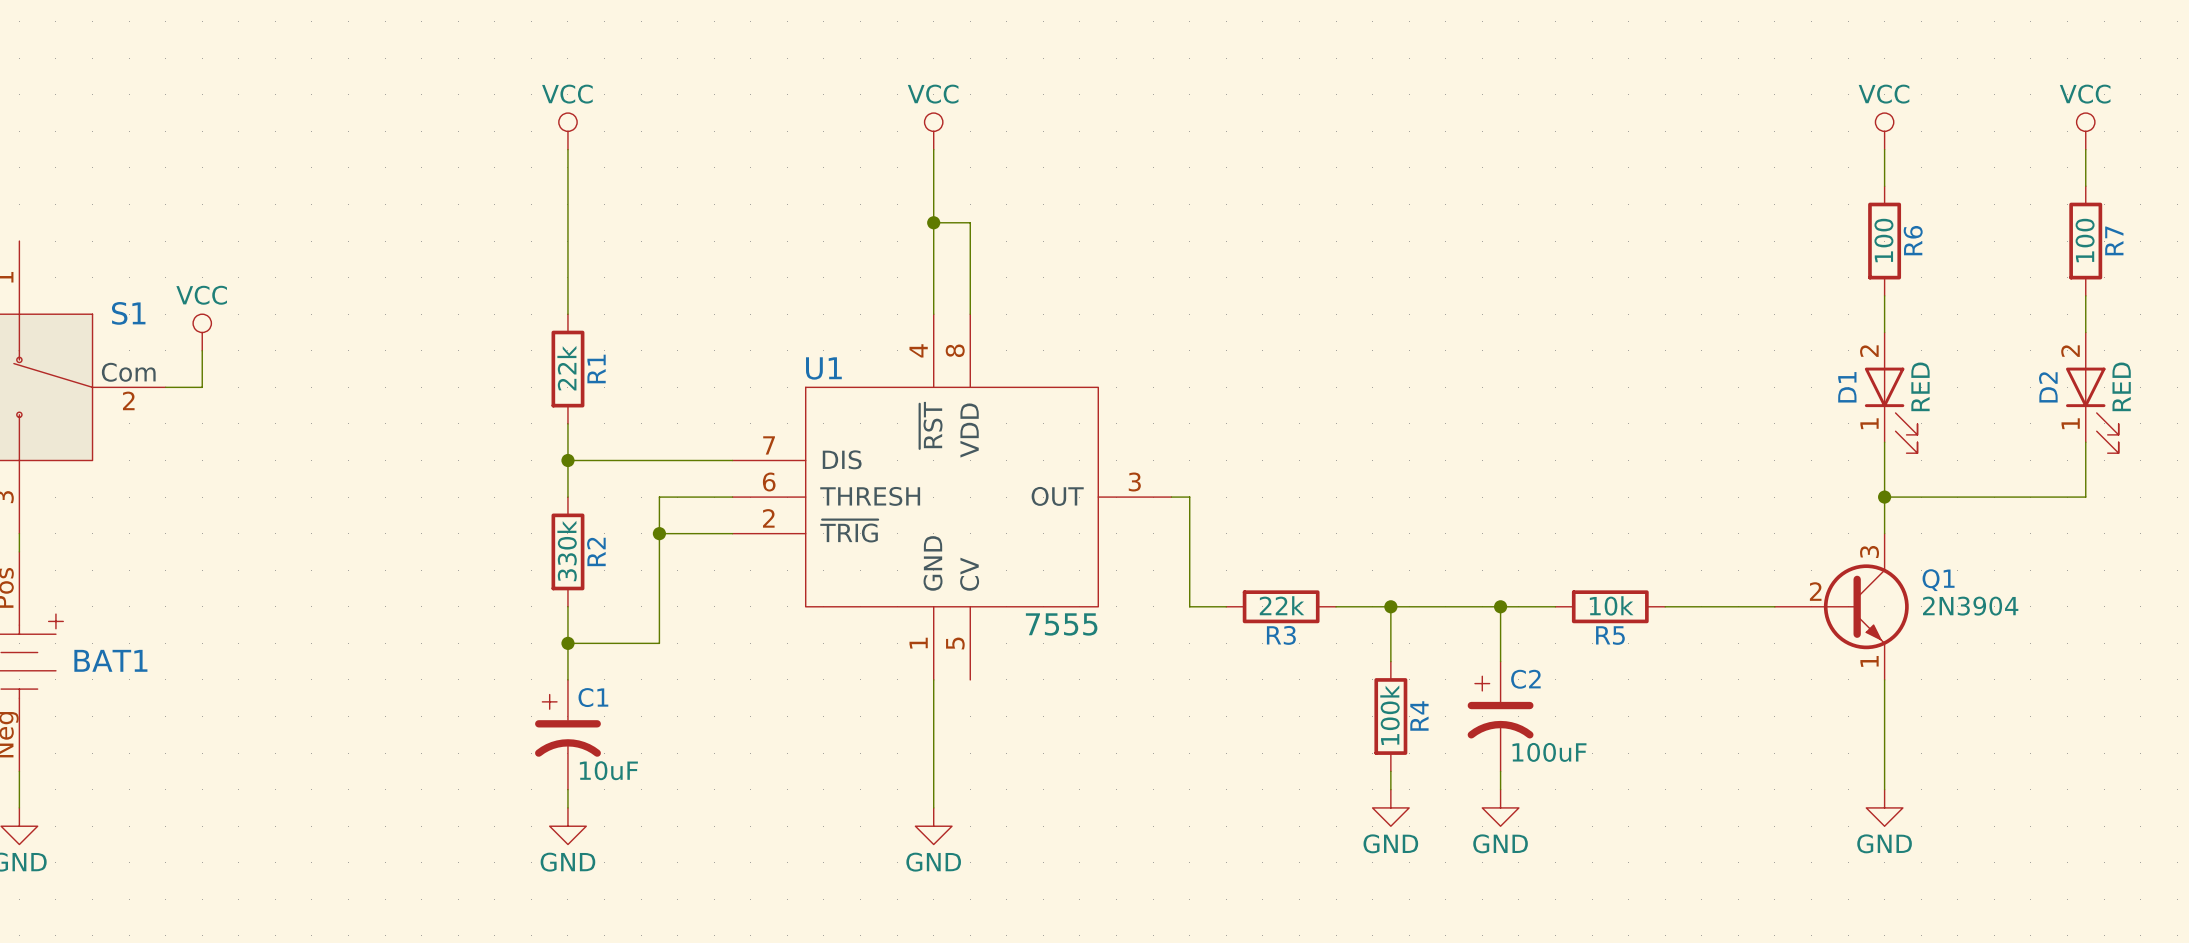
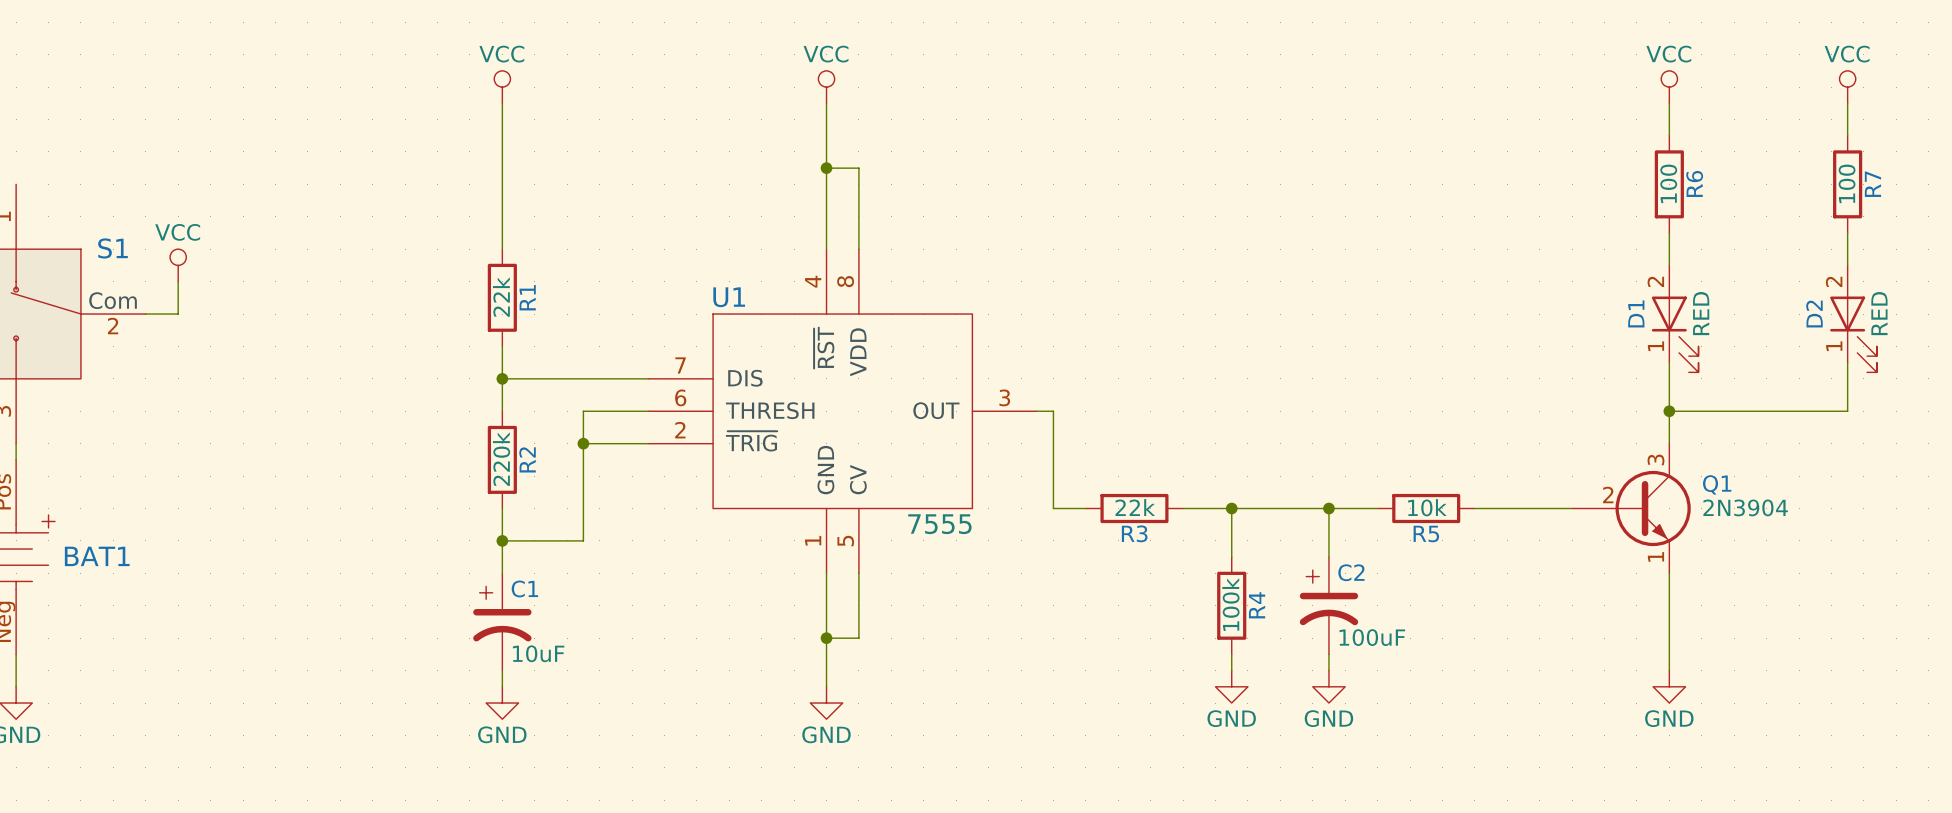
R2 value: 330k (567, 551) -> 220k (501, 459)
wire: none -> (858, 573) (858, 638) (826, 638)
junction: none -> (826, 638)

